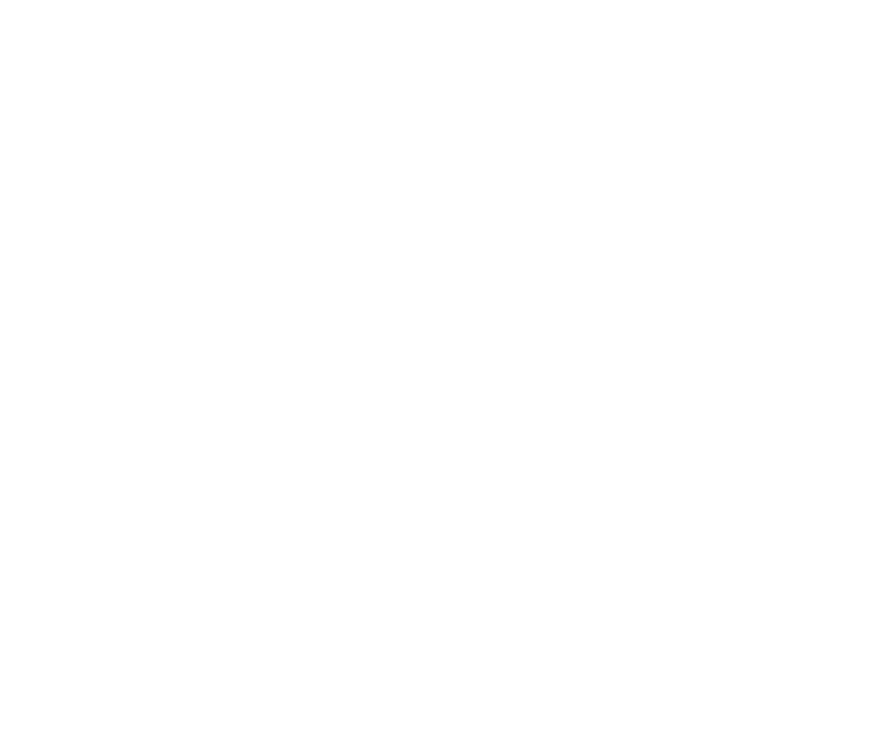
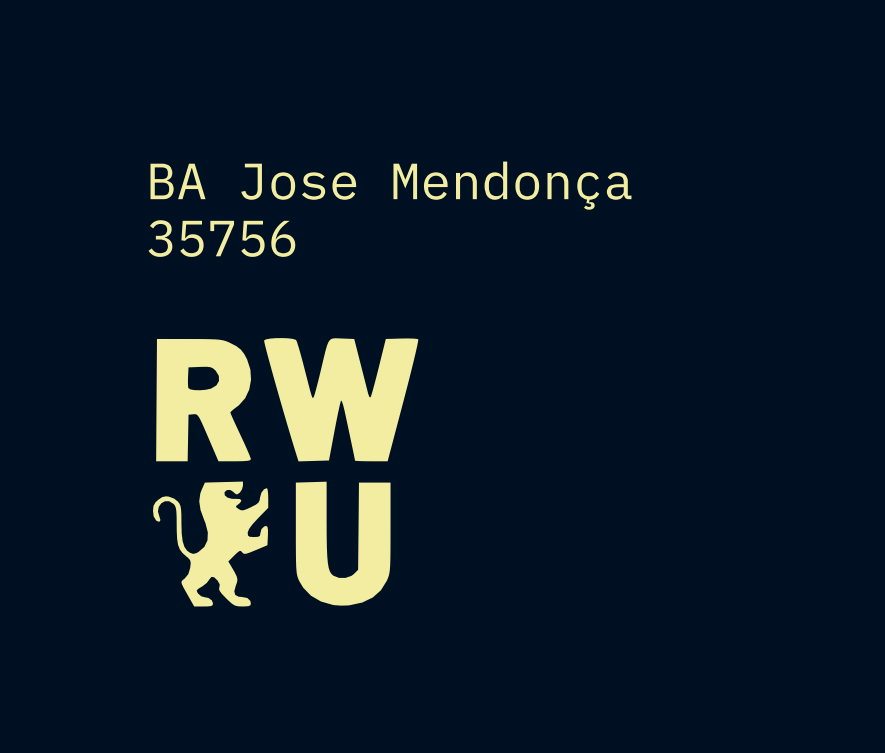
text: none -> BA Jose Mendonça (390, 185)
text: none -> 35756 (221, 238)
drawing: none -> [153, 338, 419, 607]

